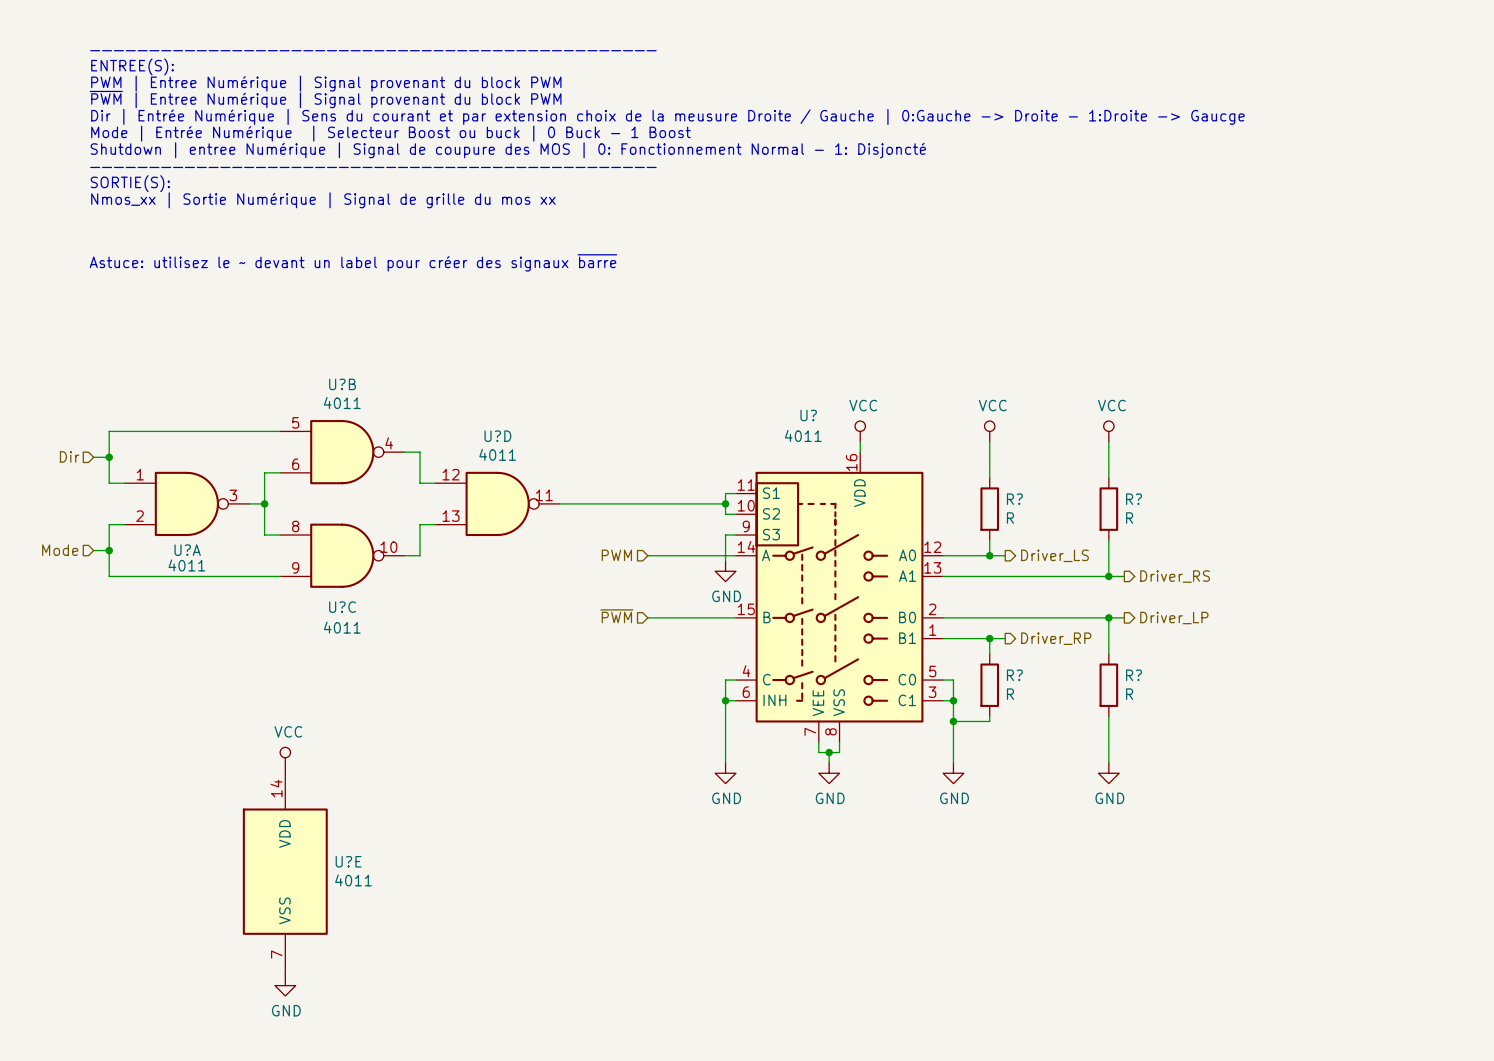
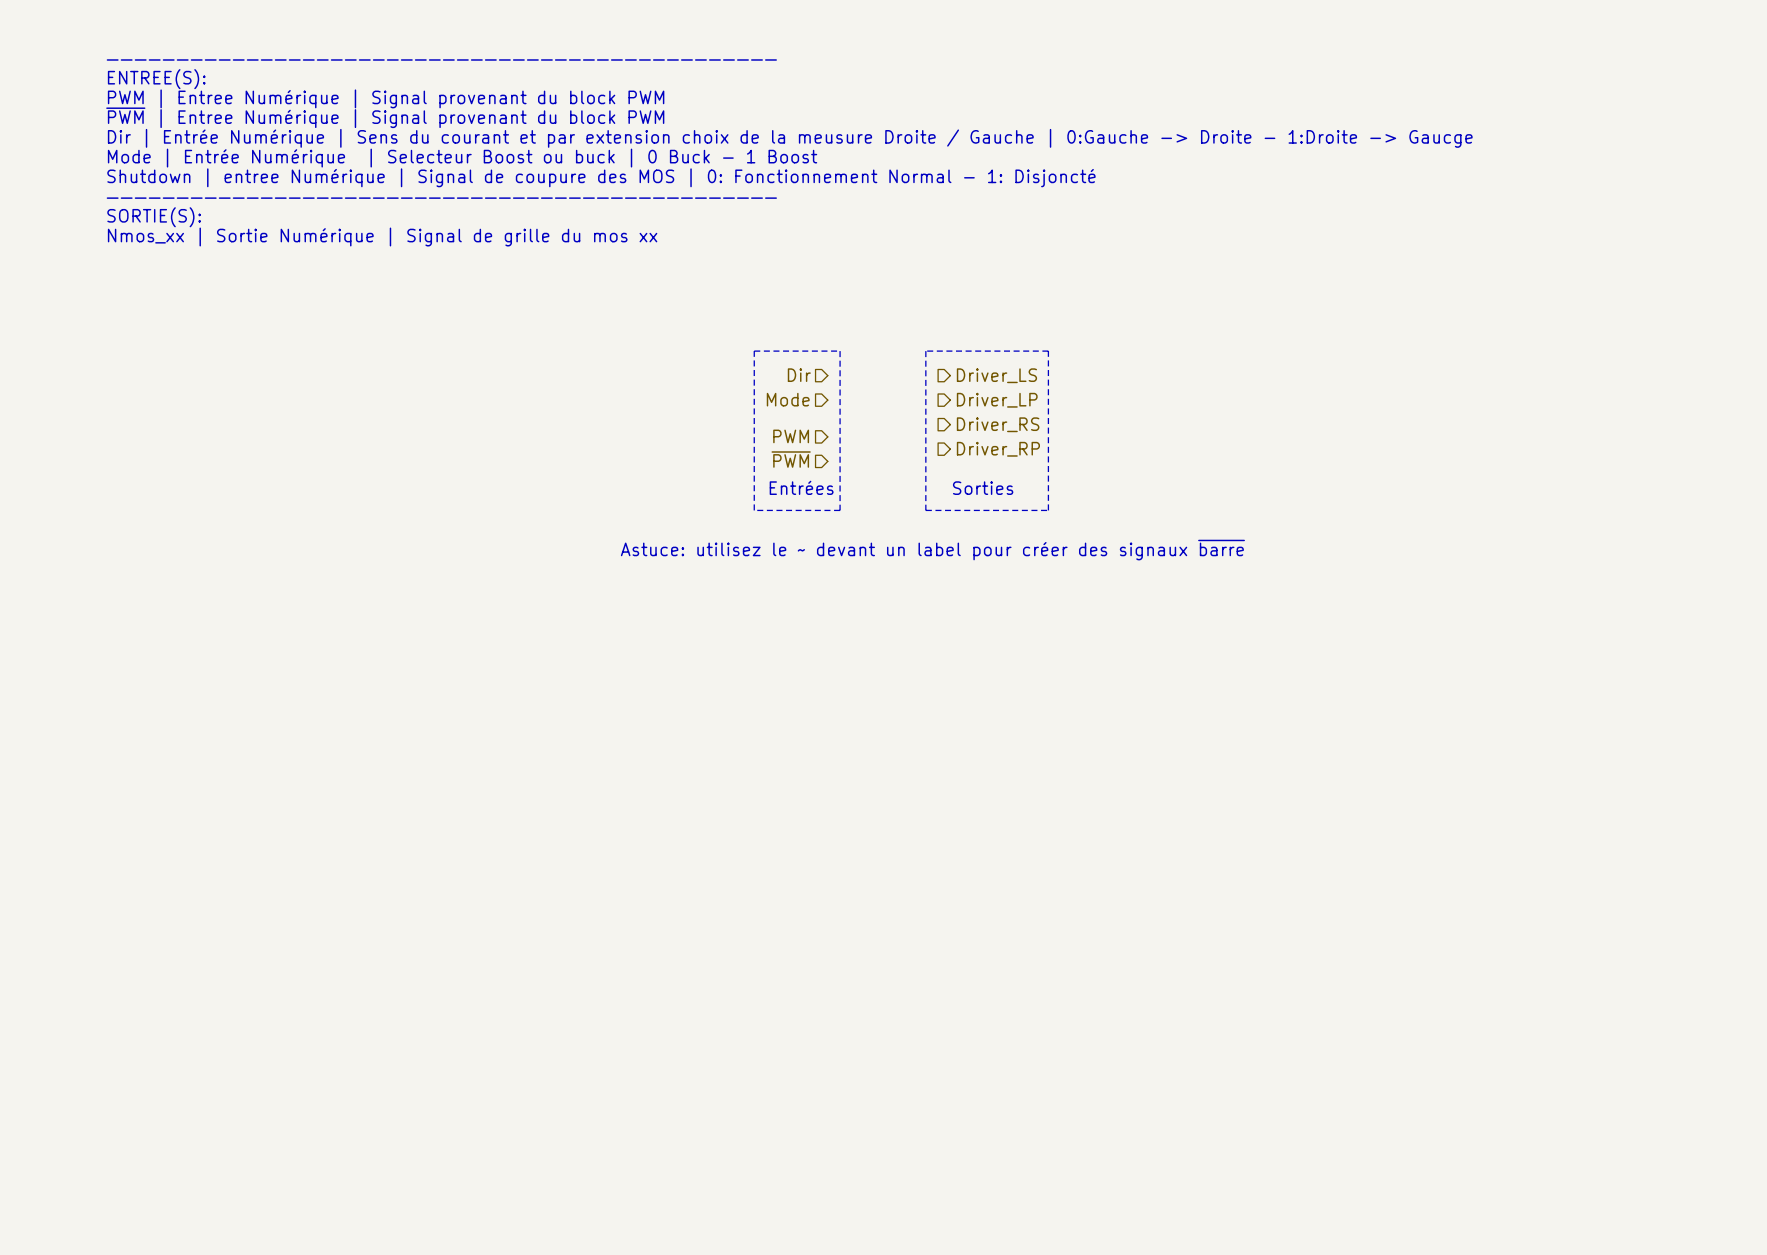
text: Astuce: utilisez le ~ devant un label pour créer des signaux ~{barre} (353, 262) -> none
line: none -> (754, 351) (840, 351) (840, 510) (754, 510) (754, 351)
line: none -> (925, 351) (1048, 351) (1048, 510) (925, 510) (925, 351)
hierarchical label: none -> Dir (799, 375)
hierarchical label: none -> Driver_LS (996, 375)
hierarchical label: none -> Mode (788, 399)
hierarchical label: none -> Driver_LP (997, 400)
hierarchical label: none -> Driver_RS (998, 424)
hierarchical label: none -> Driver_RP (998, 449)
hierarchical label: none -> ~{PWM} (791, 459)
text: none -> Entrées (801, 487)
text: none -> Sorties (983, 488)
wire: (280, 431) (109, 431) (109, 483) (124, 483) -> none
power symbol: VCC (860, 431) -> none
power symbol: VCC (989, 431) -> none
power symbol: VCC (1108, 431) -> none
wire: (860, 441) (860, 452) -> none
wire: (989, 441) (989, 478) -> none
wire: (1108, 441) (1108, 478) -> none
U?B: 4011 (342, 452) -> none
wire: (404, 452) (419, 452) (419, 483) (435, 483) -> none
hierarchical label: Dir (69, 456) -> none
wire: (93, 457) (109, 457) -> none
junction: (109, 457) -> none
text: none -> Astuce: utilisez le ~ devant un label pour créer des signaux ~{barre} (932, 550)
wire: (280, 472) (264, 472) (264, 535) (280, 535) -> none
wire: (735, 493) (725, 493) (725, 514) (735, 514) -> none
U?A: 4011 (186, 503) -> none
wire: (249, 503) (264, 503) -> none
junction: (264, 503) -> none
U?D: 4011 (497, 503) -> none
wire: (559, 503) (725, 503) -> none
junction: (725, 503) -> none
R?: R (989, 509) -> none
R?: R (1108, 509) -> none
wire: (124, 524) (109, 524) (109, 576) (280, 576) -> none
wire: (435, 524) (419, 524) (419, 555) (404, 555) -> none
wire: (735, 535) (725, 535) (725, 560) -> none
wire: (989, 540) (989, 555) -> none
wire: (1108, 540) (1108, 576) -> none
hierarchical label: Mode (60, 550) -> none
wire: (93, 550) (109, 550) -> none
junction: (109, 550) -> none
U?C: 4011 (342, 555) -> none
hierarchical label position: PWM (616, 555) -> PWM (791, 436)
wire: (647, 555) (735, 555) -> none
wire: (943, 555) (1005, 555) -> none
junction: (989, 555) -> none
hierarchical label: Driver_LS (1054, 555) -> none
power symbol: GND (725, 571) -> none
wire: (943, 576) (1124, 576) -> none
junction: (1108, 576) -> none
hierarchical label: Driver_RS (1175, 576) -> none
U?: 4011 (839, 597) -> none
hierarchical label: ~{PWM} (616, 616) -> none
wire: (647, 617) (735, 617) -> none
wire: (943, 617) (1124, 617) -> none
wire: (1108, 617) (1108, 654) -> none
junction: (1108, 617) -> none
hierarchical label: Driver_LP (1174, 617) -> none
wire: (943, 638) (1005, 638) -> none
wire: (989, 638) (989, 654) -> none
junction: (989, 638) -> none
hierarchical label: Driver_RP (1056, 638) -> none
wire: (735, 680) (725, 680) (725, 762) -> none
wire: (943, 680) (953, 680) (953, 762) -> none
R?: R (989, 685) -> none
R?: R (1108, 685) -> none
wire: (725, 700) (735, 700) -> none
junction: (725, 700) -> none
wire: (943, 700) (953, 700) -> none
junction: (953, 700) -> none
wire: (989, 716) (989, 721) (953, 721) -> none
wire: (1108, 716) (1108, 762) -> none
junction: (953, 721) -> none
wire: (818, 742) (818, 752) (839, 752) (839, 742) -> none
wire: (829, 752) (829, 762) -> none
junction: (829, 752) -> none
power symbol: VCC (285, 757) -> none
power symbol: GND (725, 773) -> none
power symbol: GND (829, 773) -> none
power symbol: GND (953, 773) -> none
power symbol: GND (1108, 773) -> none
U?E: 4011 (285, 871) -> none
power symbol: GND (285, 985) -> none

